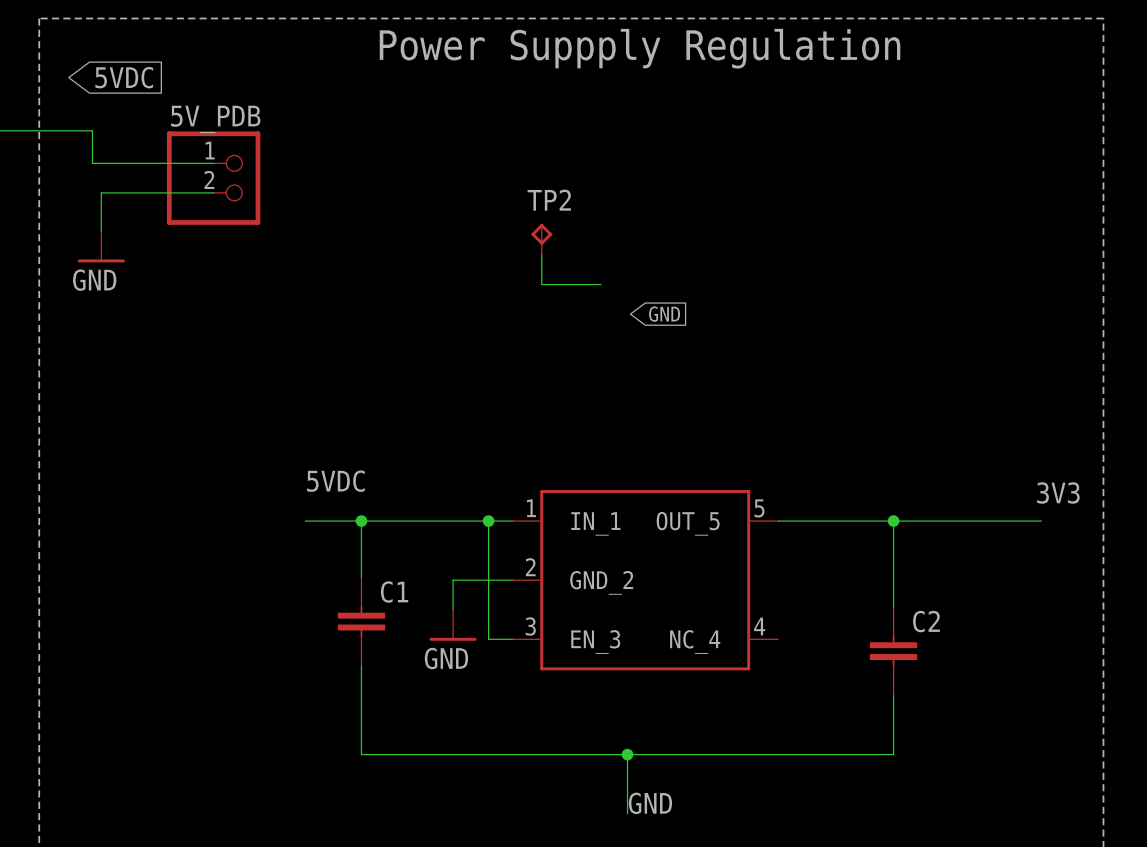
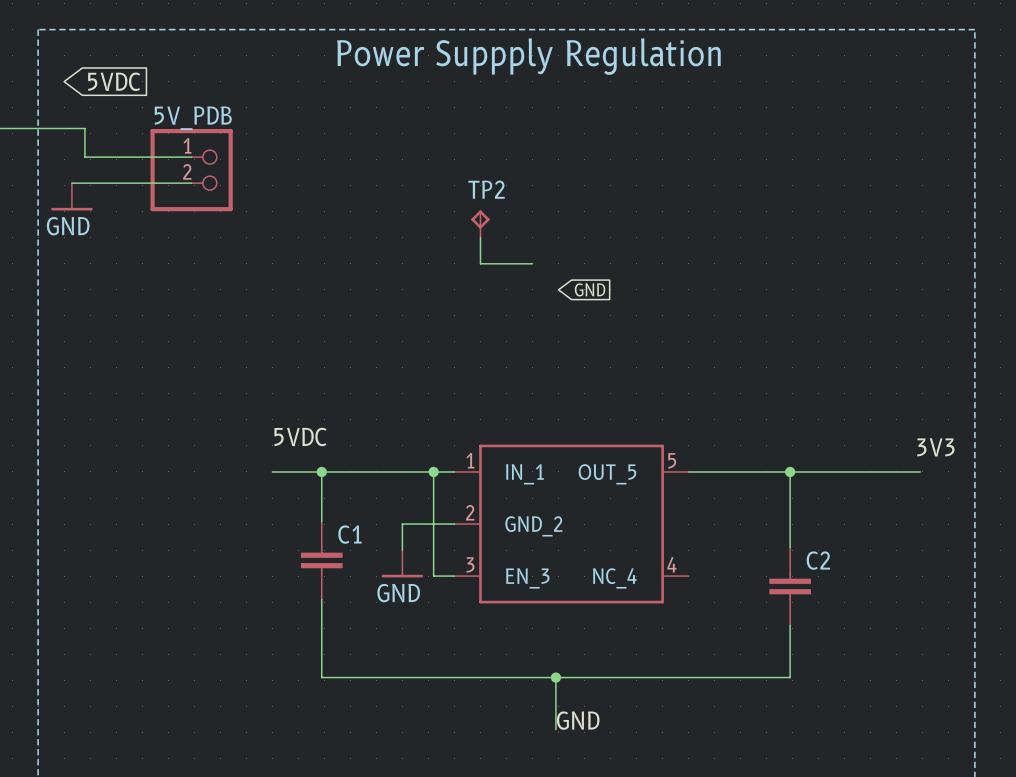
wire: (101, 192) (101, 231) -> (92, 183) (71, 183)
power symbol position: GND (101, 246) -> GND (71, 196)

